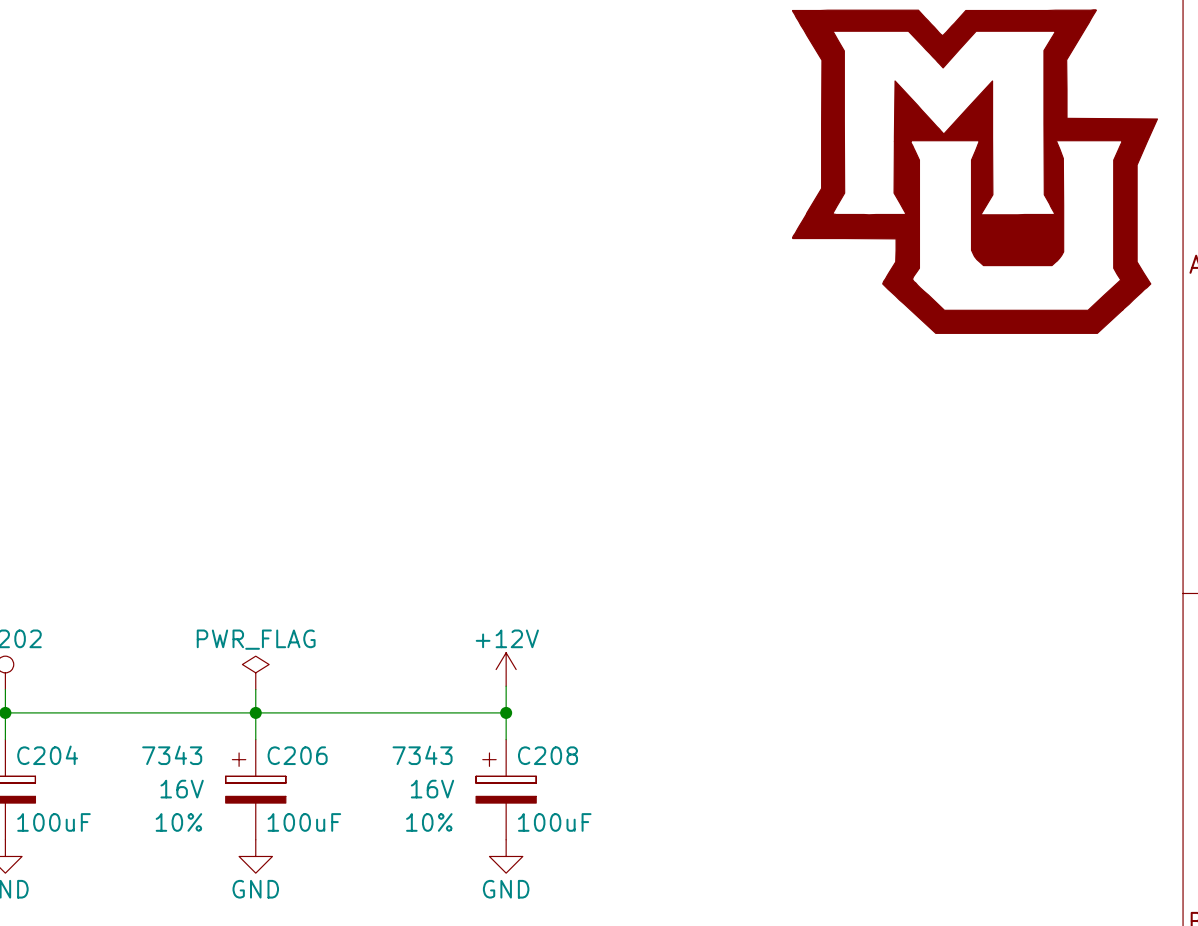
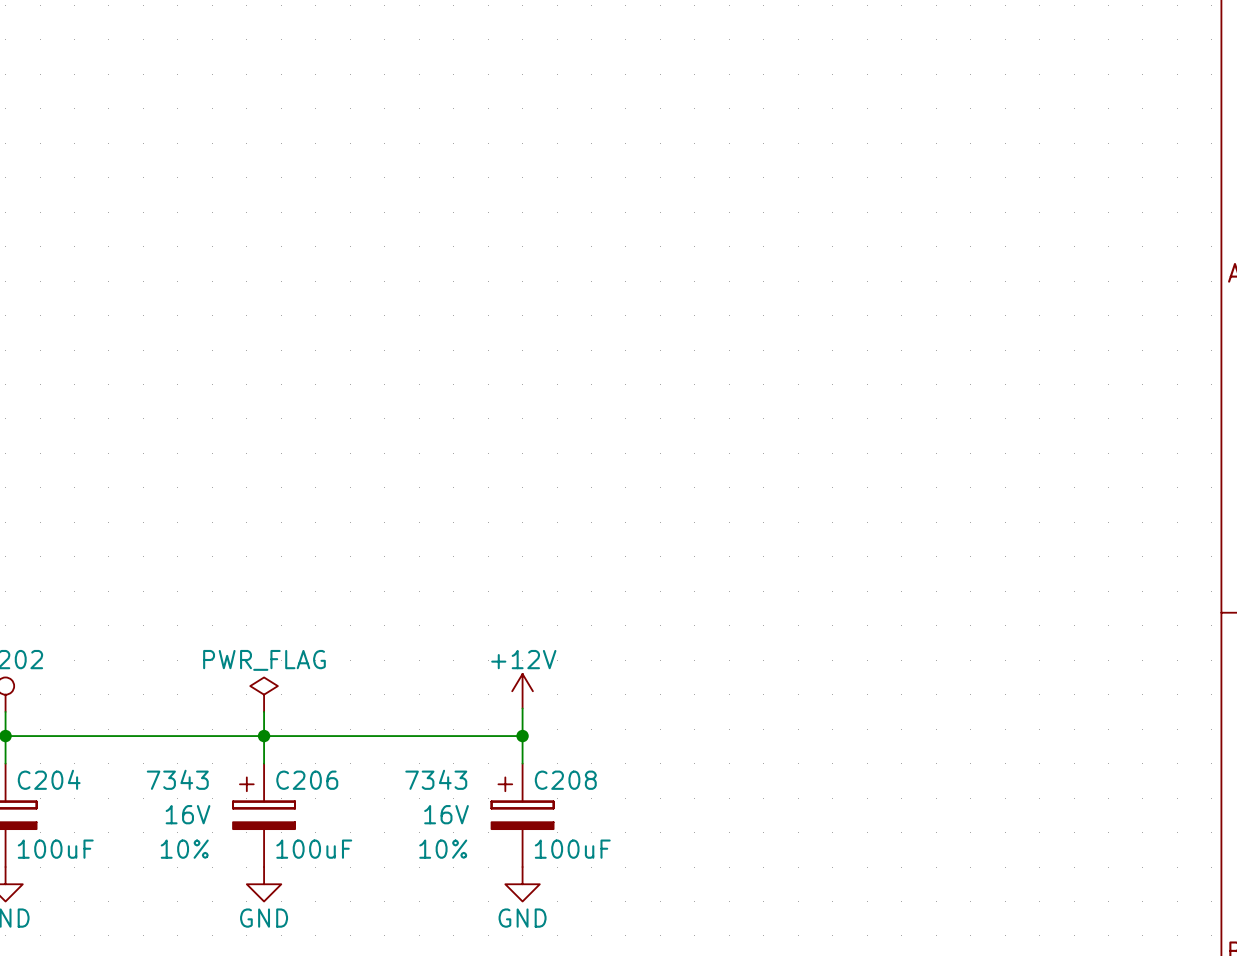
power symbol: (975, 171) -> none

